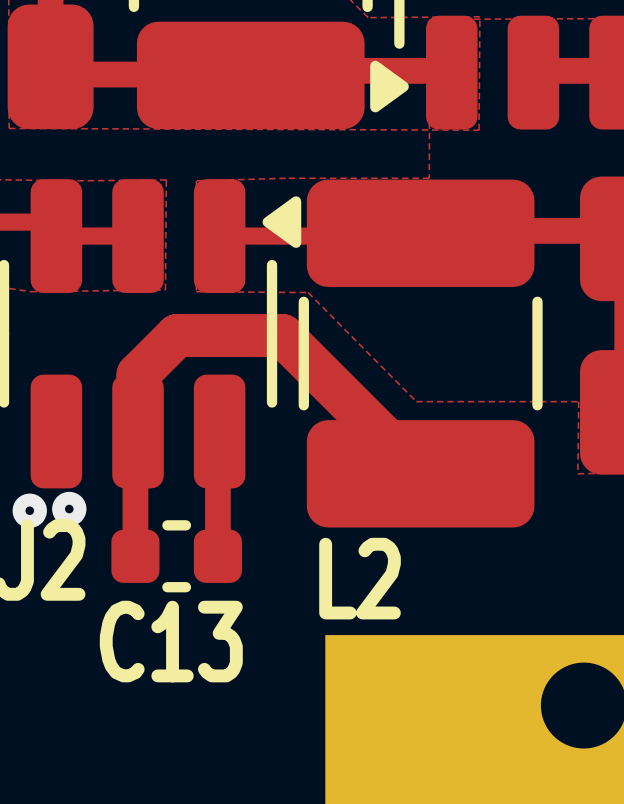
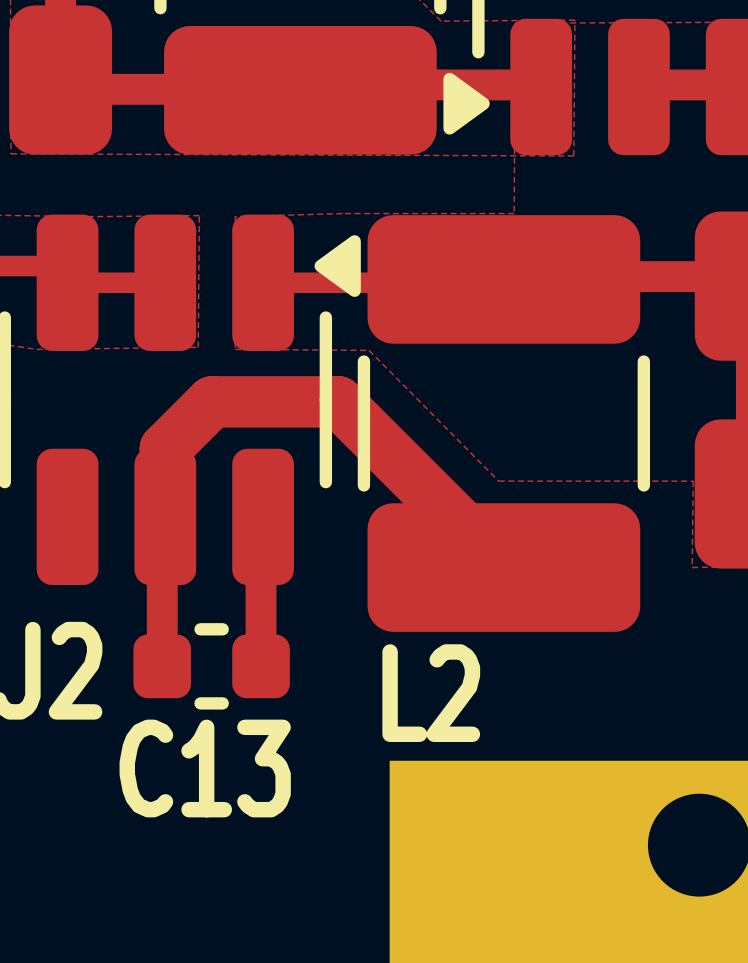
via: (69, 509) -> none
via: (29, 510) -> none

